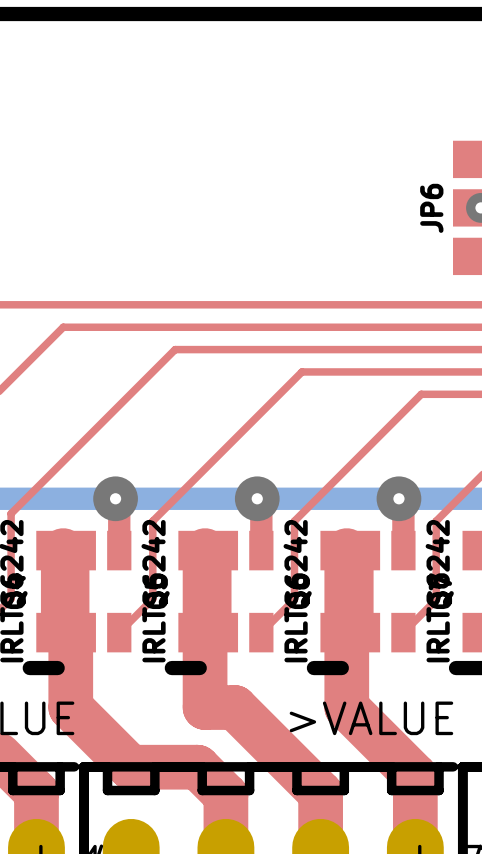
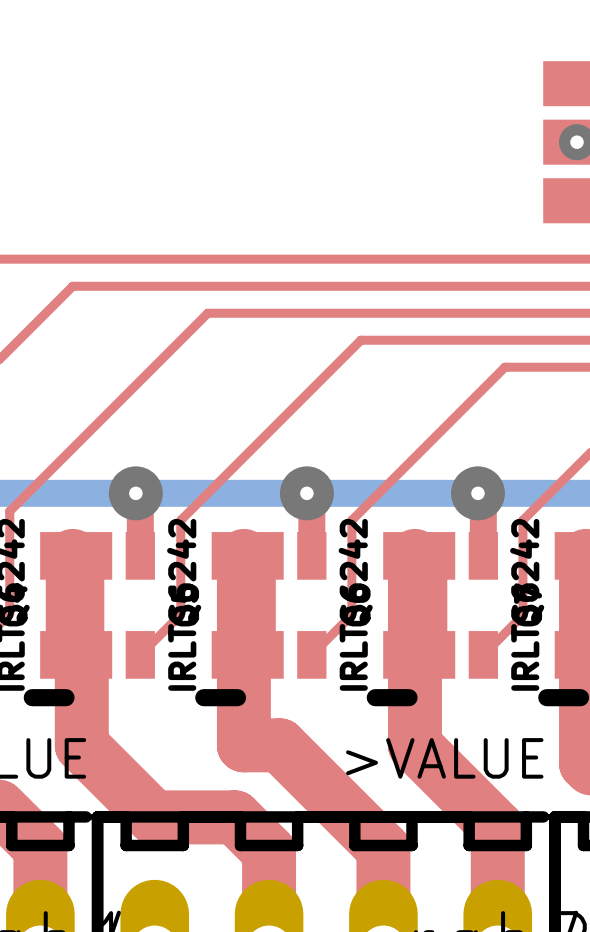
JP6 name: JP6 (431, 208) -> none

